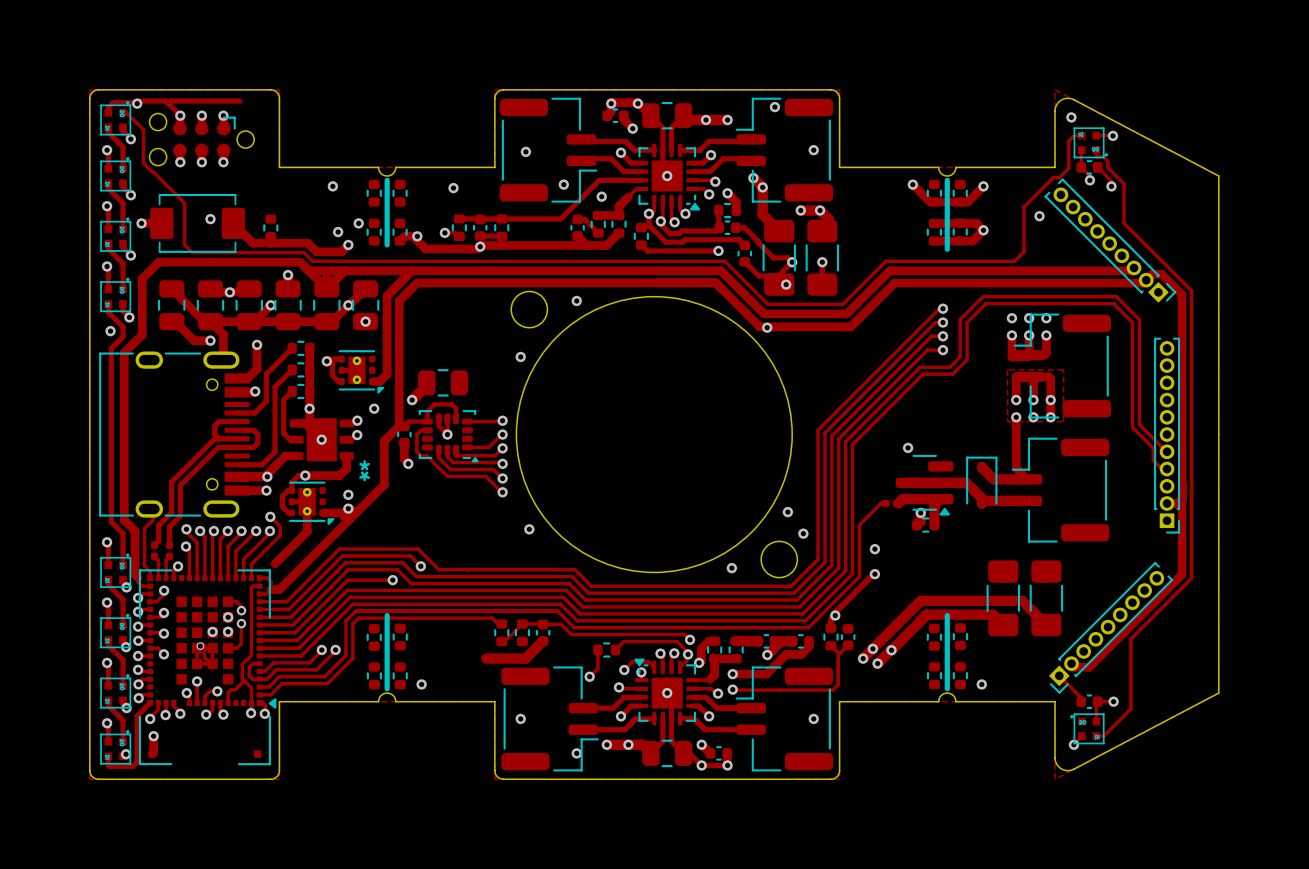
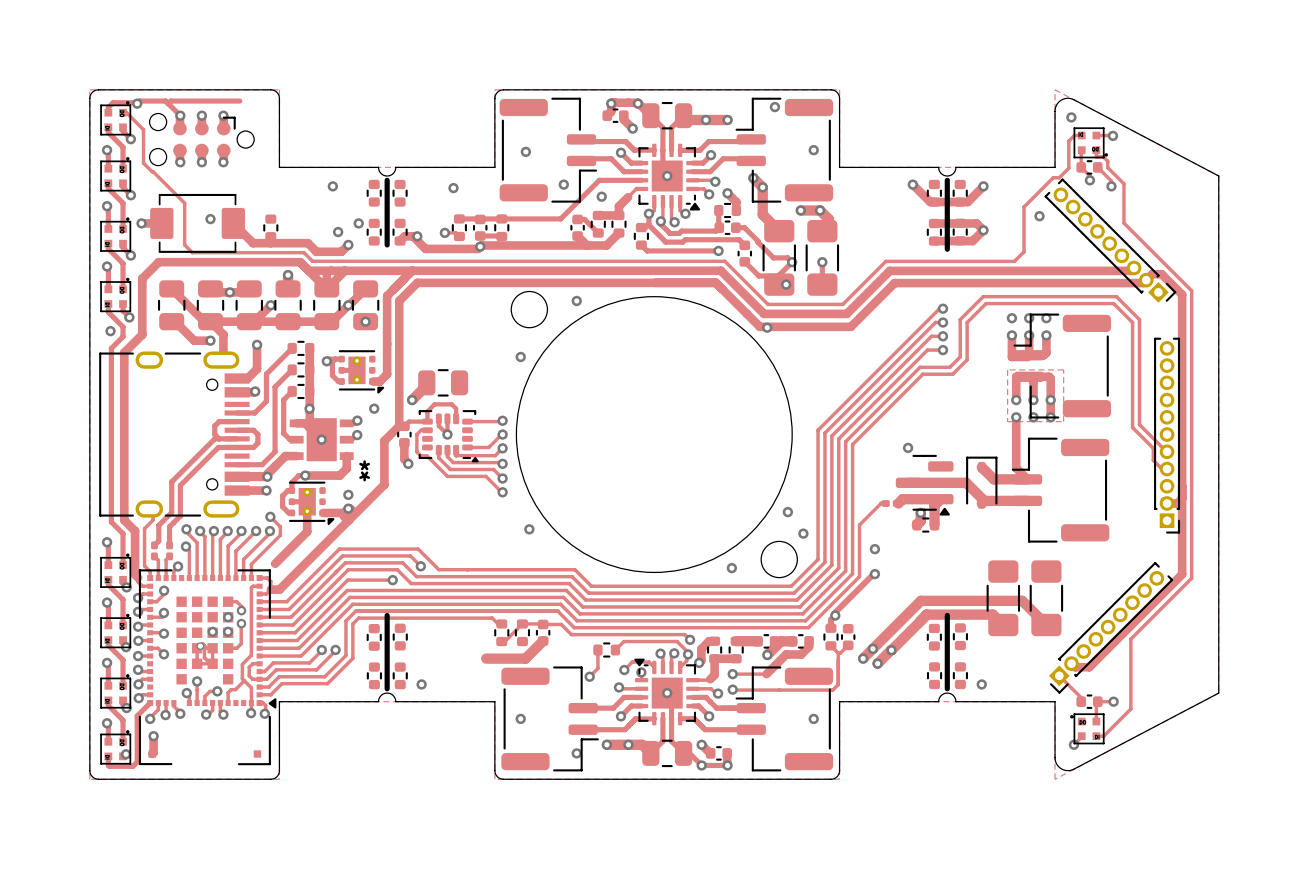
track width: thick (732, 674) (766, 674) -> thin (732, 674) (766, 674)

